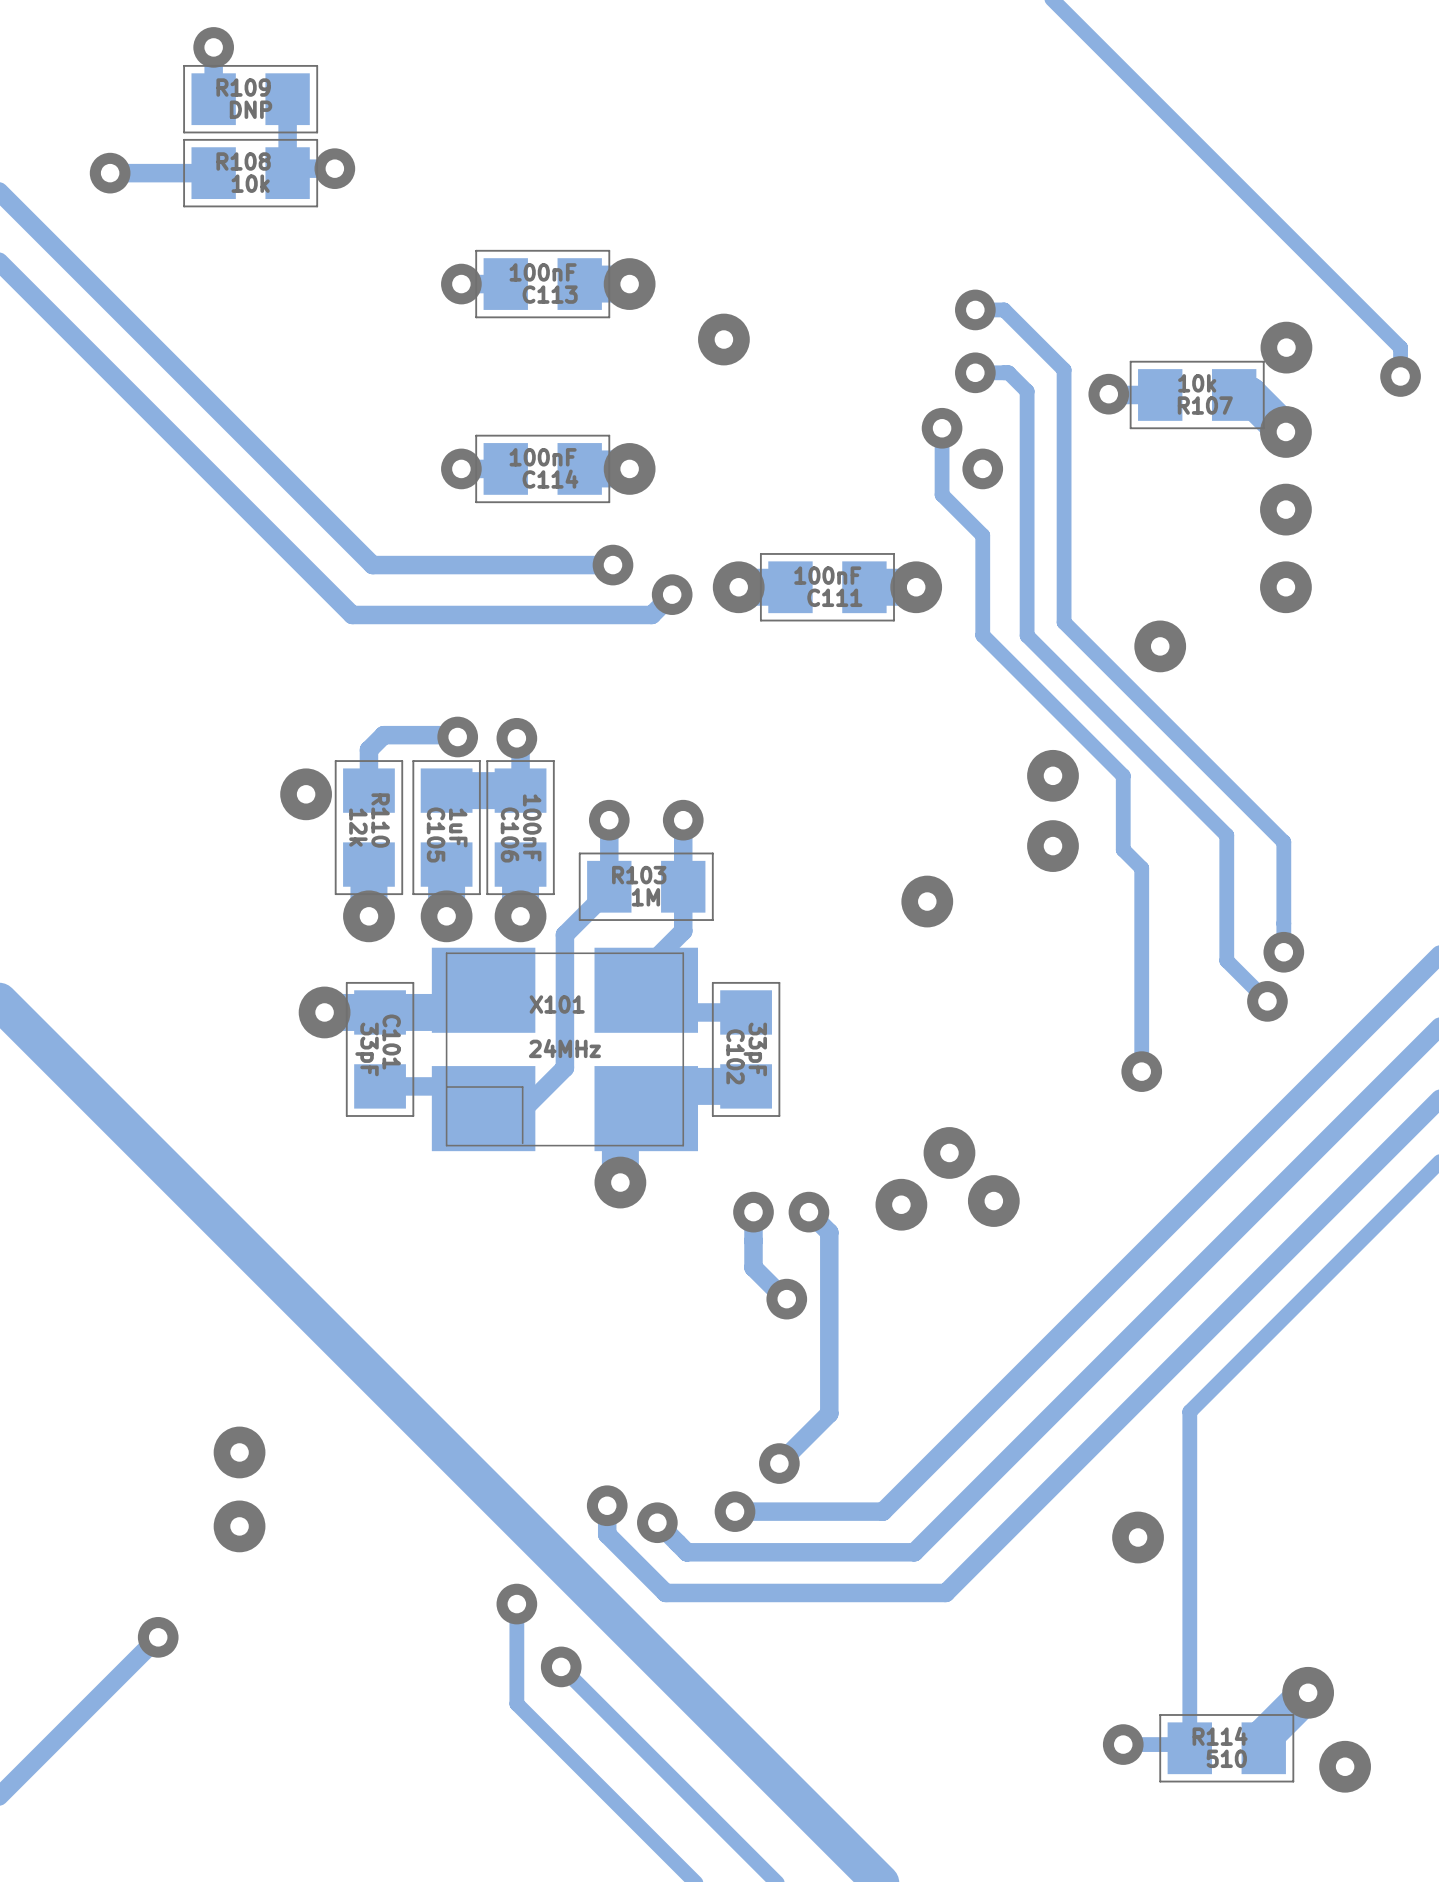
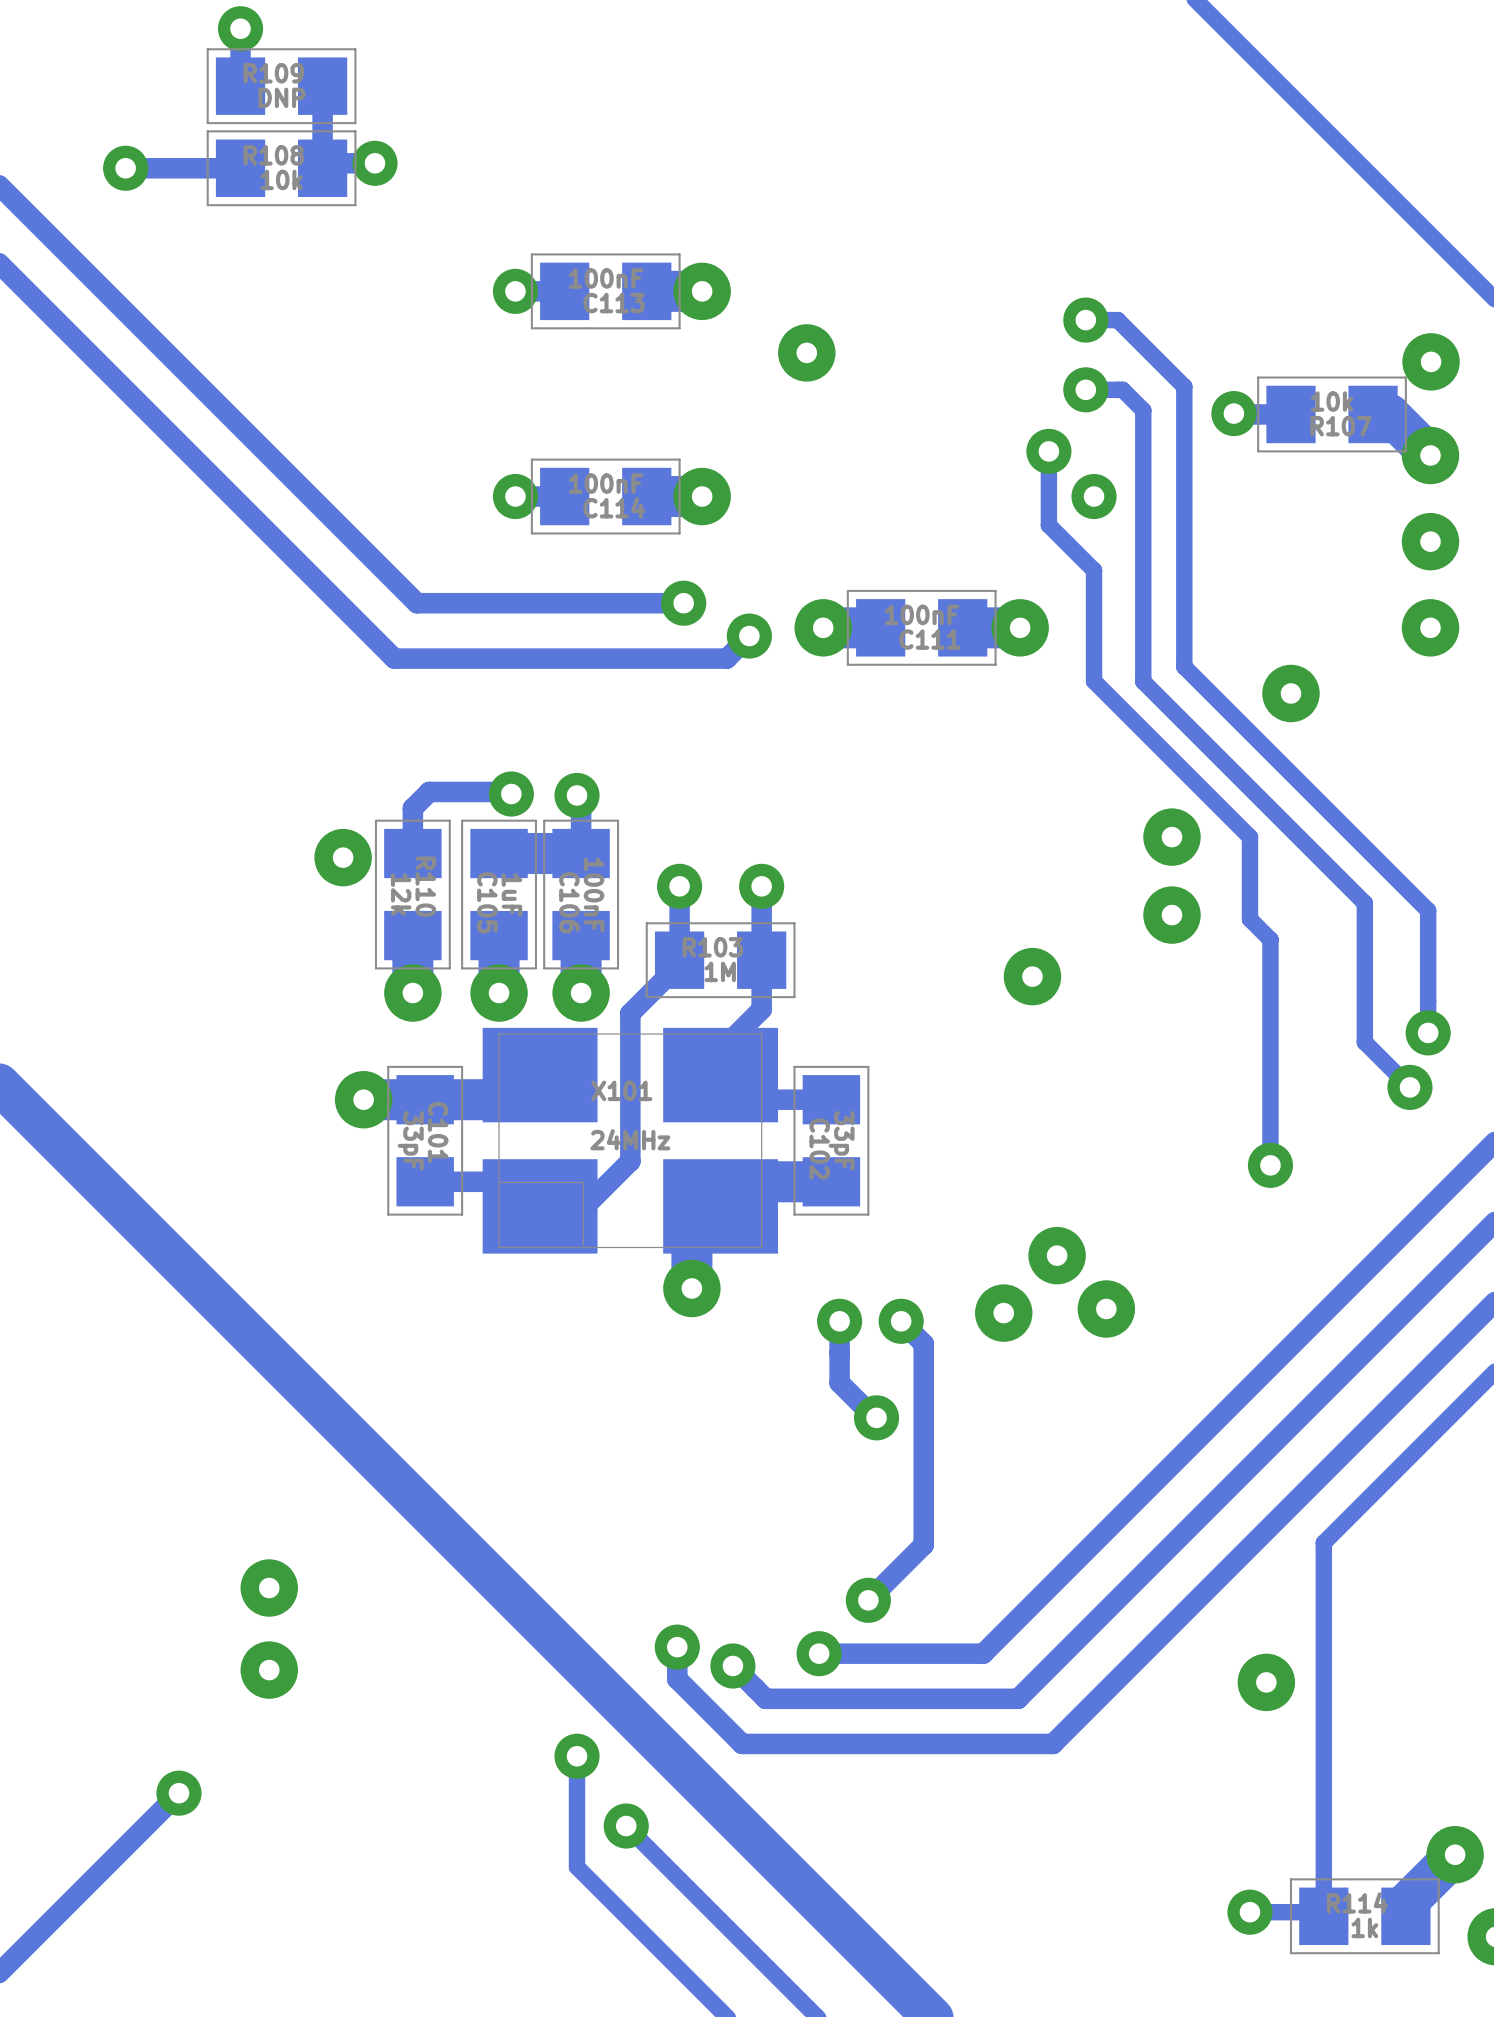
R114 value: 510 (1226, 1758) -> 1k (1364, 1927)

